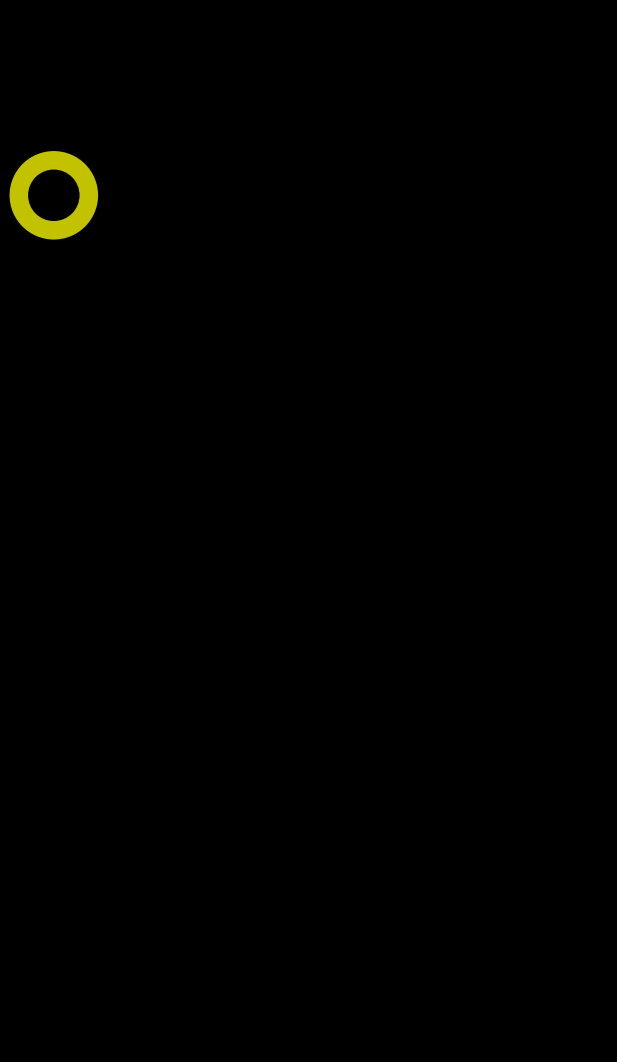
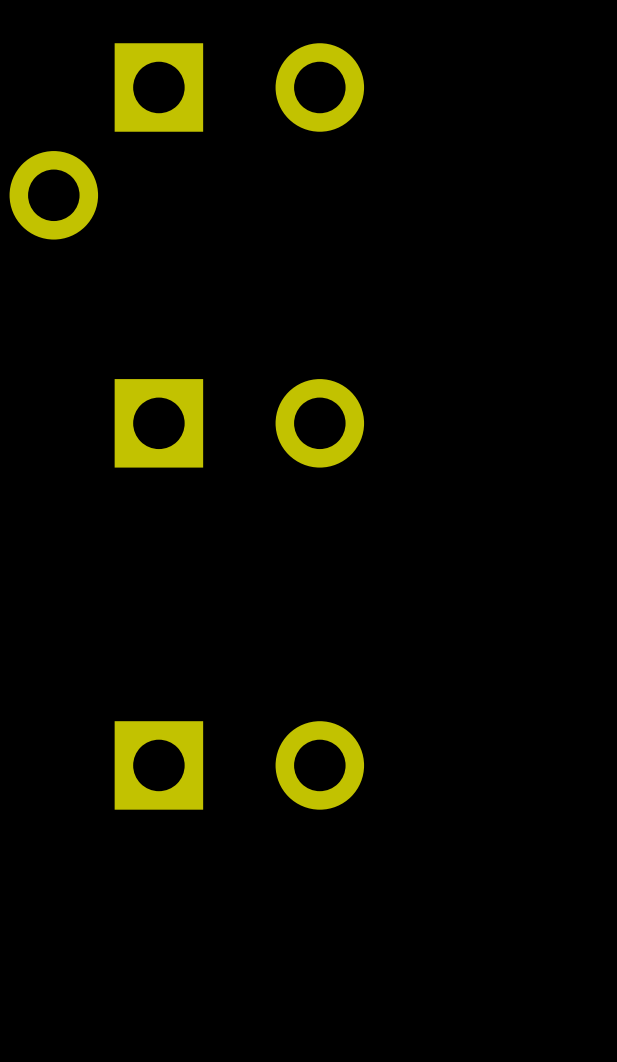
part: none -> (239, 87)
part: none -> (239, 423)
part: none -> (239, 765)

